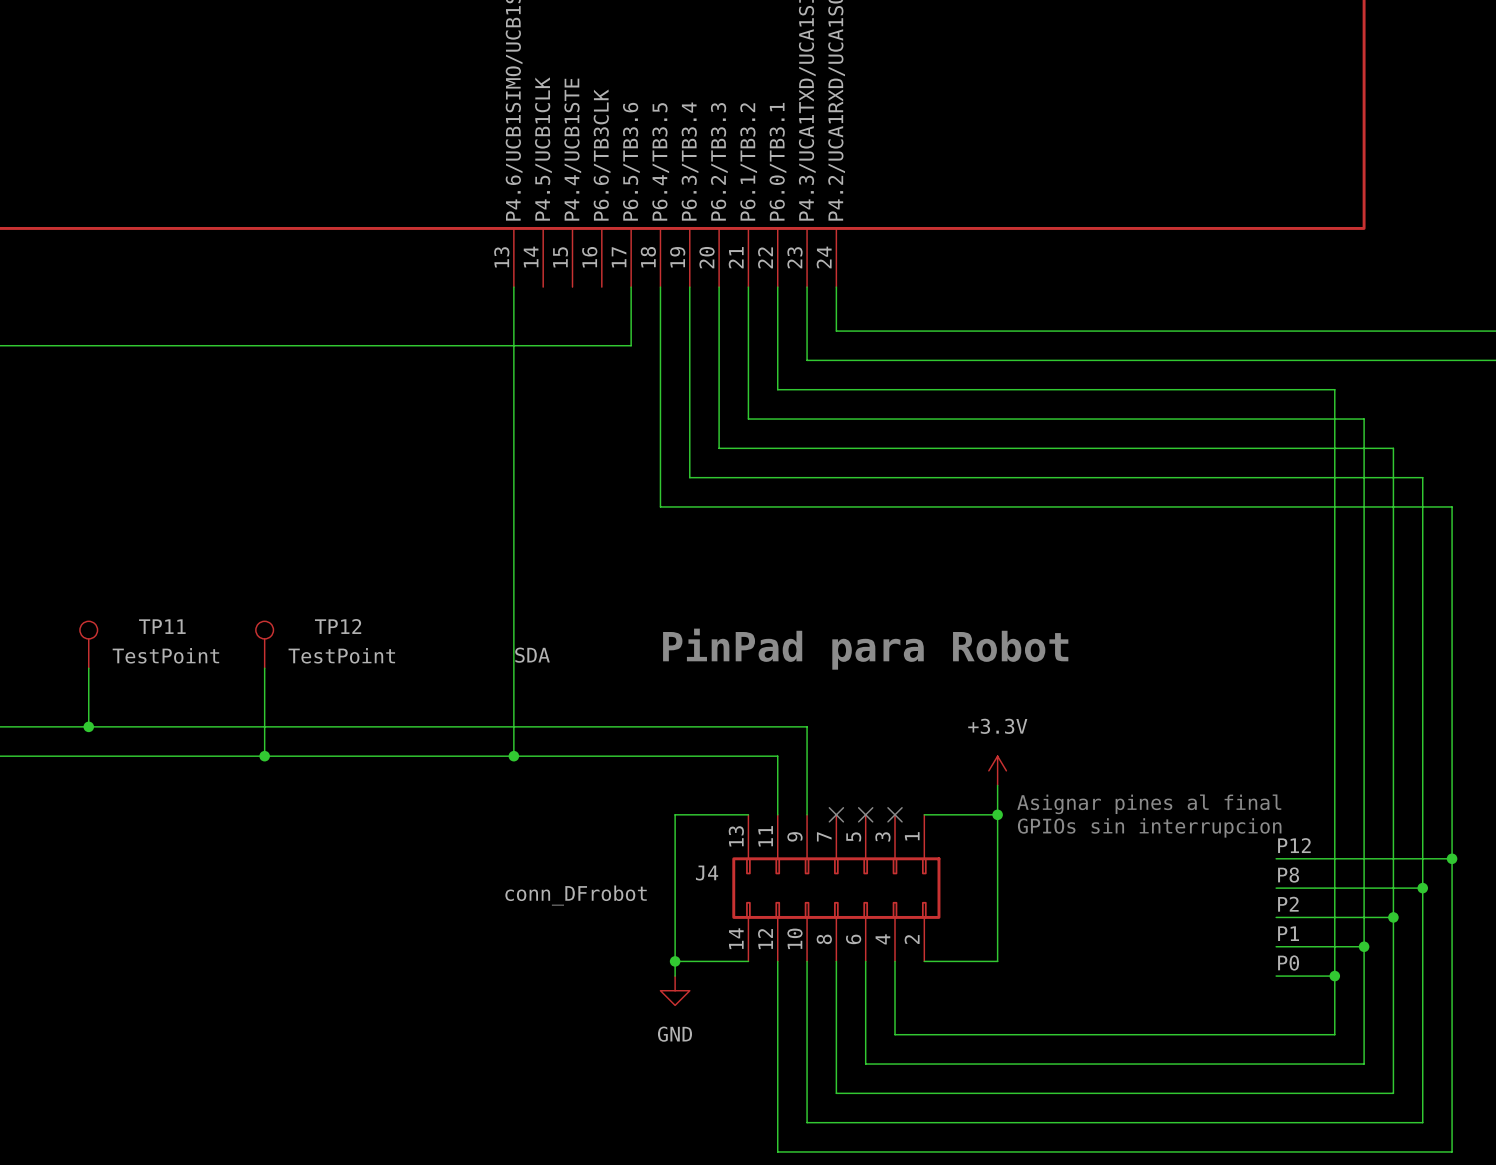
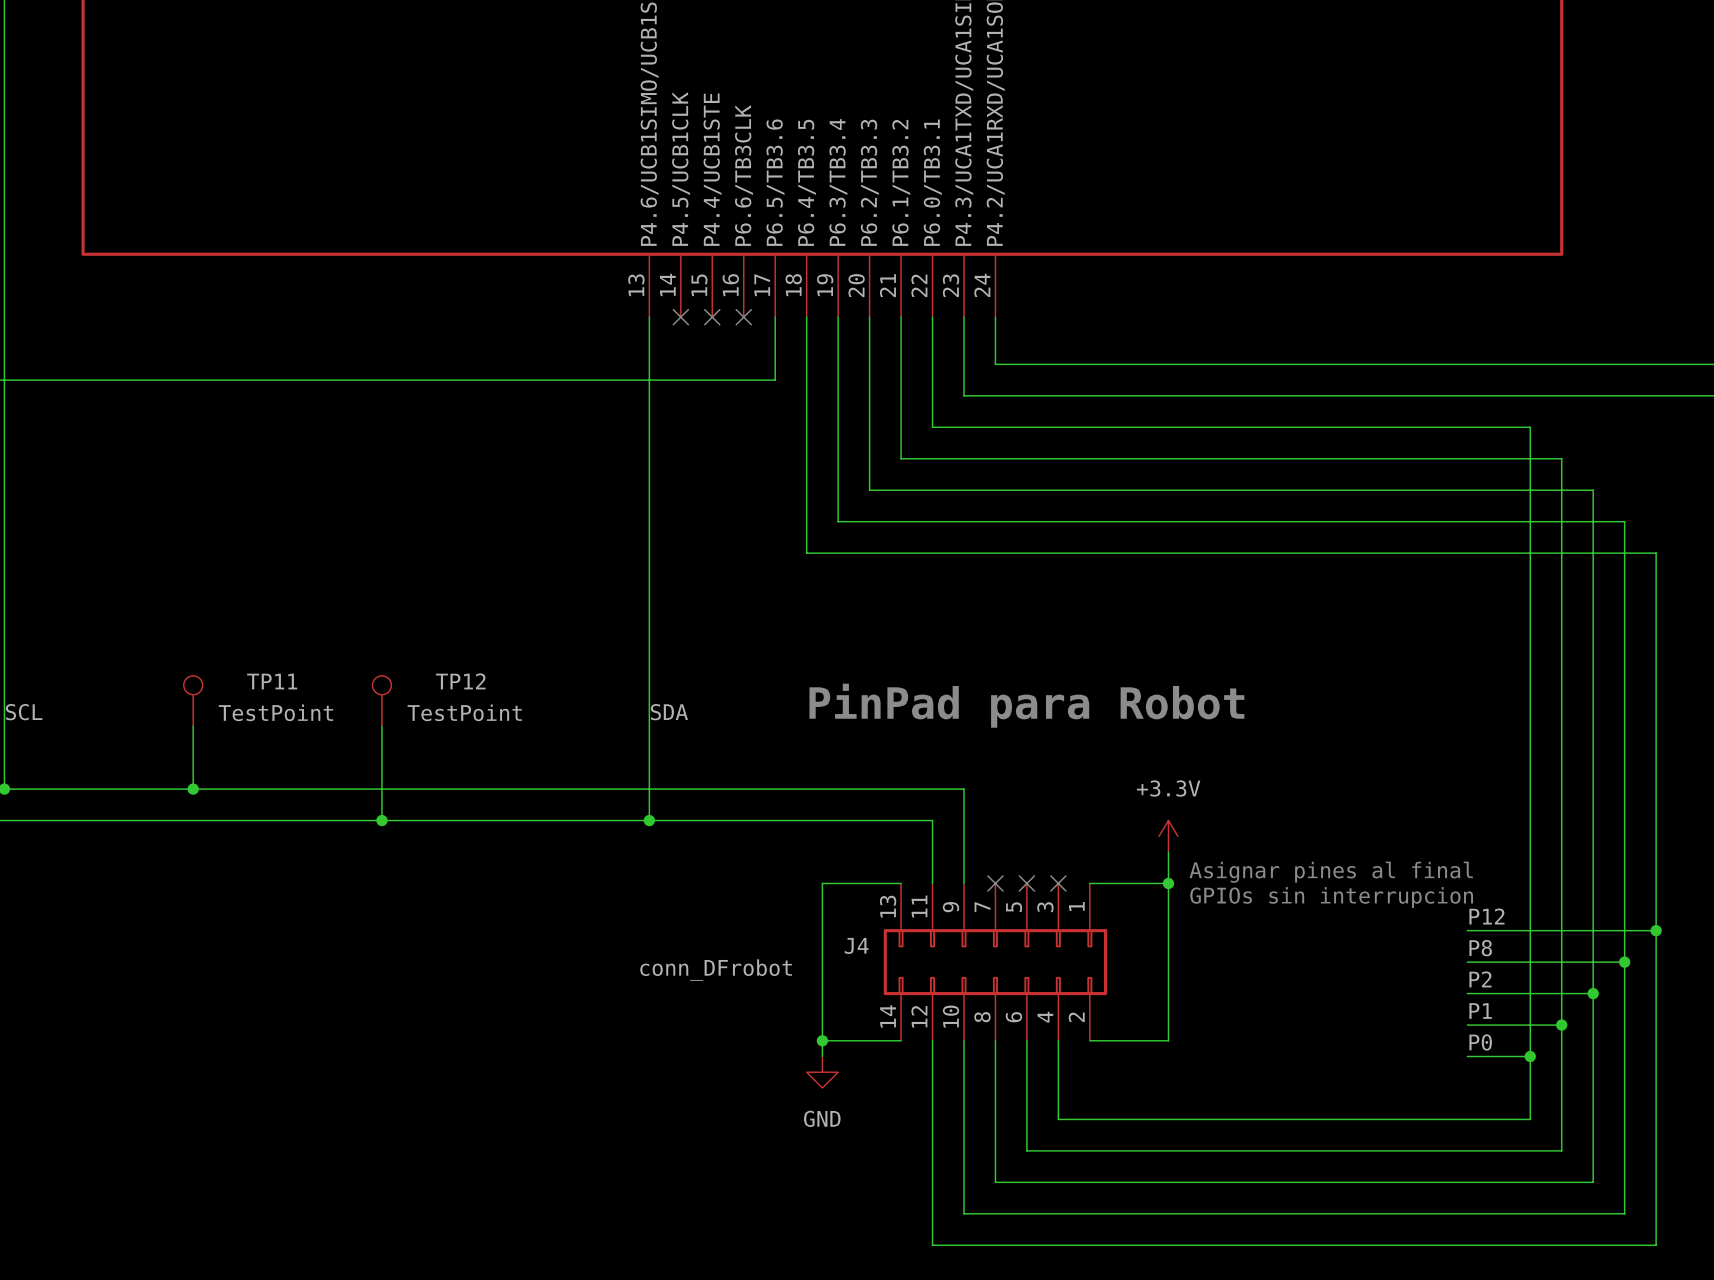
no-connect mark: none -> (680, 317)
no-connect mark: none -> (712, 317)
no-connect mark: none -> (743, 317)

